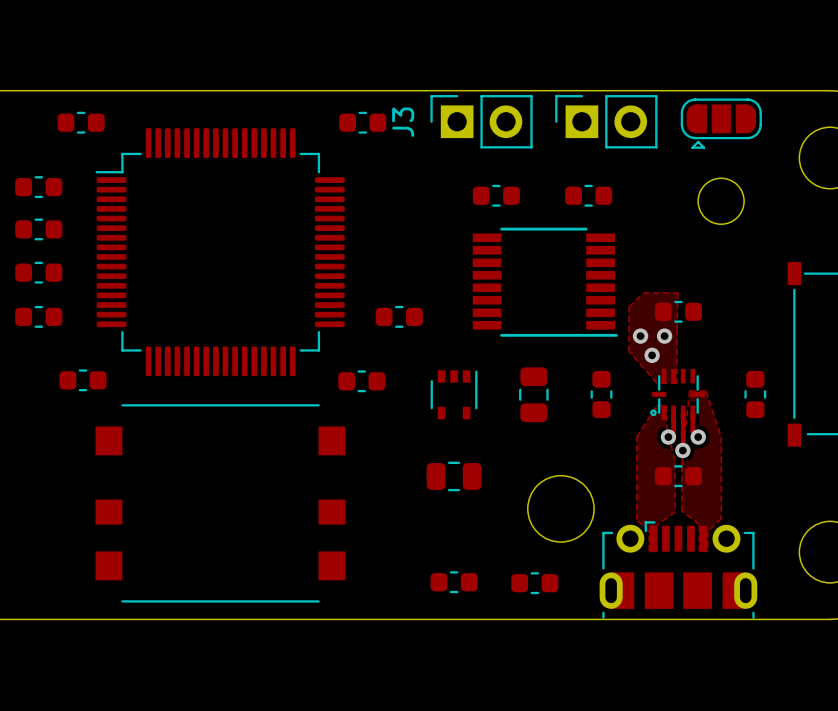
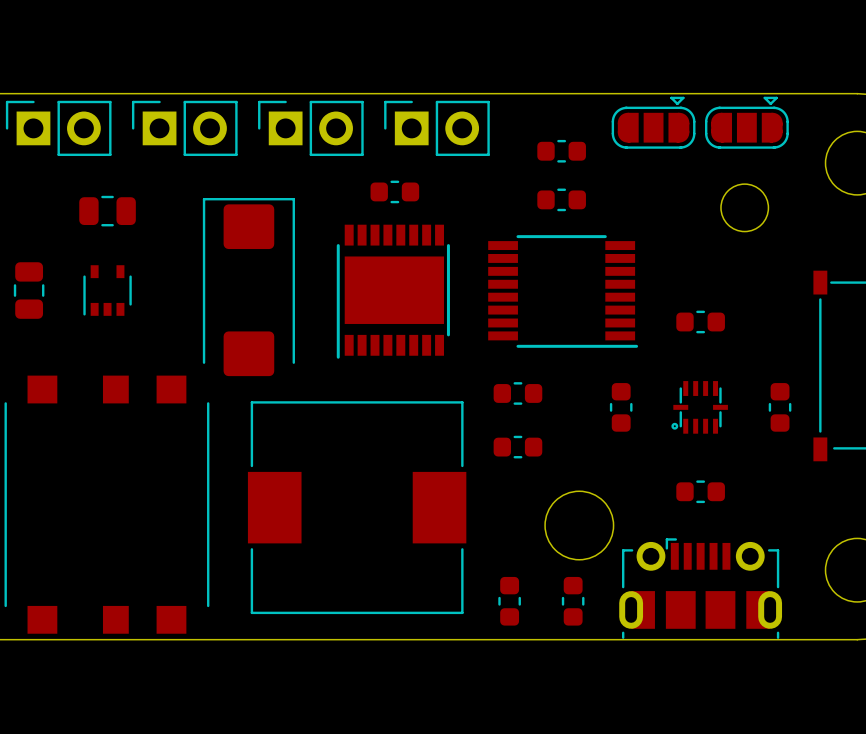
part: none -> (653, 122)
J3: (481, 121) -> none
part: (606, 121) -> none
part: (81, 122) -> none
part: (362, 122) -> none
part rotation: 0° (721, 123) -> 180° (746, 122)
part: none -> (58, 128)
part: none -> (184, 128)
part: none -> (310, 128)
part: none -> (436, 128)
part: none -> (561, 151)
part: none -> (394, 191)
part: (38, 187) -> none
part: none -> (561, 199)
part: (496, 195) -> none
part: (588, 195) -> none
part: none -> (107, 211)
part: (38, 229) -> none
part: (220, 252) -> none
part footprint: [15, 261, 63, 284] -> [13, 262, 45, 319]
part: none -> (248, 287)
part: none -> (393, 291)
zone outline: (643, 292) (629, 307) (629, 351) (656, 383) (677, 383) (678, 292) (643, 292) -> none
part: (38, 316) -> none
part: (399, 316) -> none
via: (640, 336) -> none
via: (664, 336) -> none
via: (652, 355) -> none
part: (82, 380) -> none
part: (361, 381) -> none
part: none -> (517, 393)
zone outline: (689, 390) (681, 464) (681, 511) (699, 524) (699, 551) (707, 551) (707, 531) (721, 518) (721, 437) (705, 390) (689, 390) -> none
part rotation: 0° (454, 394) -> 180° (107, 290)
part position: (454, 394) -> (107, 290)
part: (533, 394) -> none
zone outline: (656, 405) (636, 437) (636, 519) (649, 532) (649, 551) (656, 551) (656, 525) (675, 512) (675, 463) (666, 425) (666, 405) (656, 405) -> none
track: (673, 412) (673, 431) (668, 437) -> none
track: (683, 412) (682, 450) -> none
track: (692, 412) (692, 431) (698, 437) -> none
part: none -> (517, 447)
via: (668, 437) -> none
via: (698, 437) -> none
via: (682, 450) -> none
part: (454, 476) -> none
part: none -> (357, 507)
part rotation: 0° (220, 503) -> 90° counterclockwise (106, 504)
part: (454, 582) -> none
part: none -> (509, 601)
part rotation: 0° (534, 583) -> 90° clockwise (573, 601)

